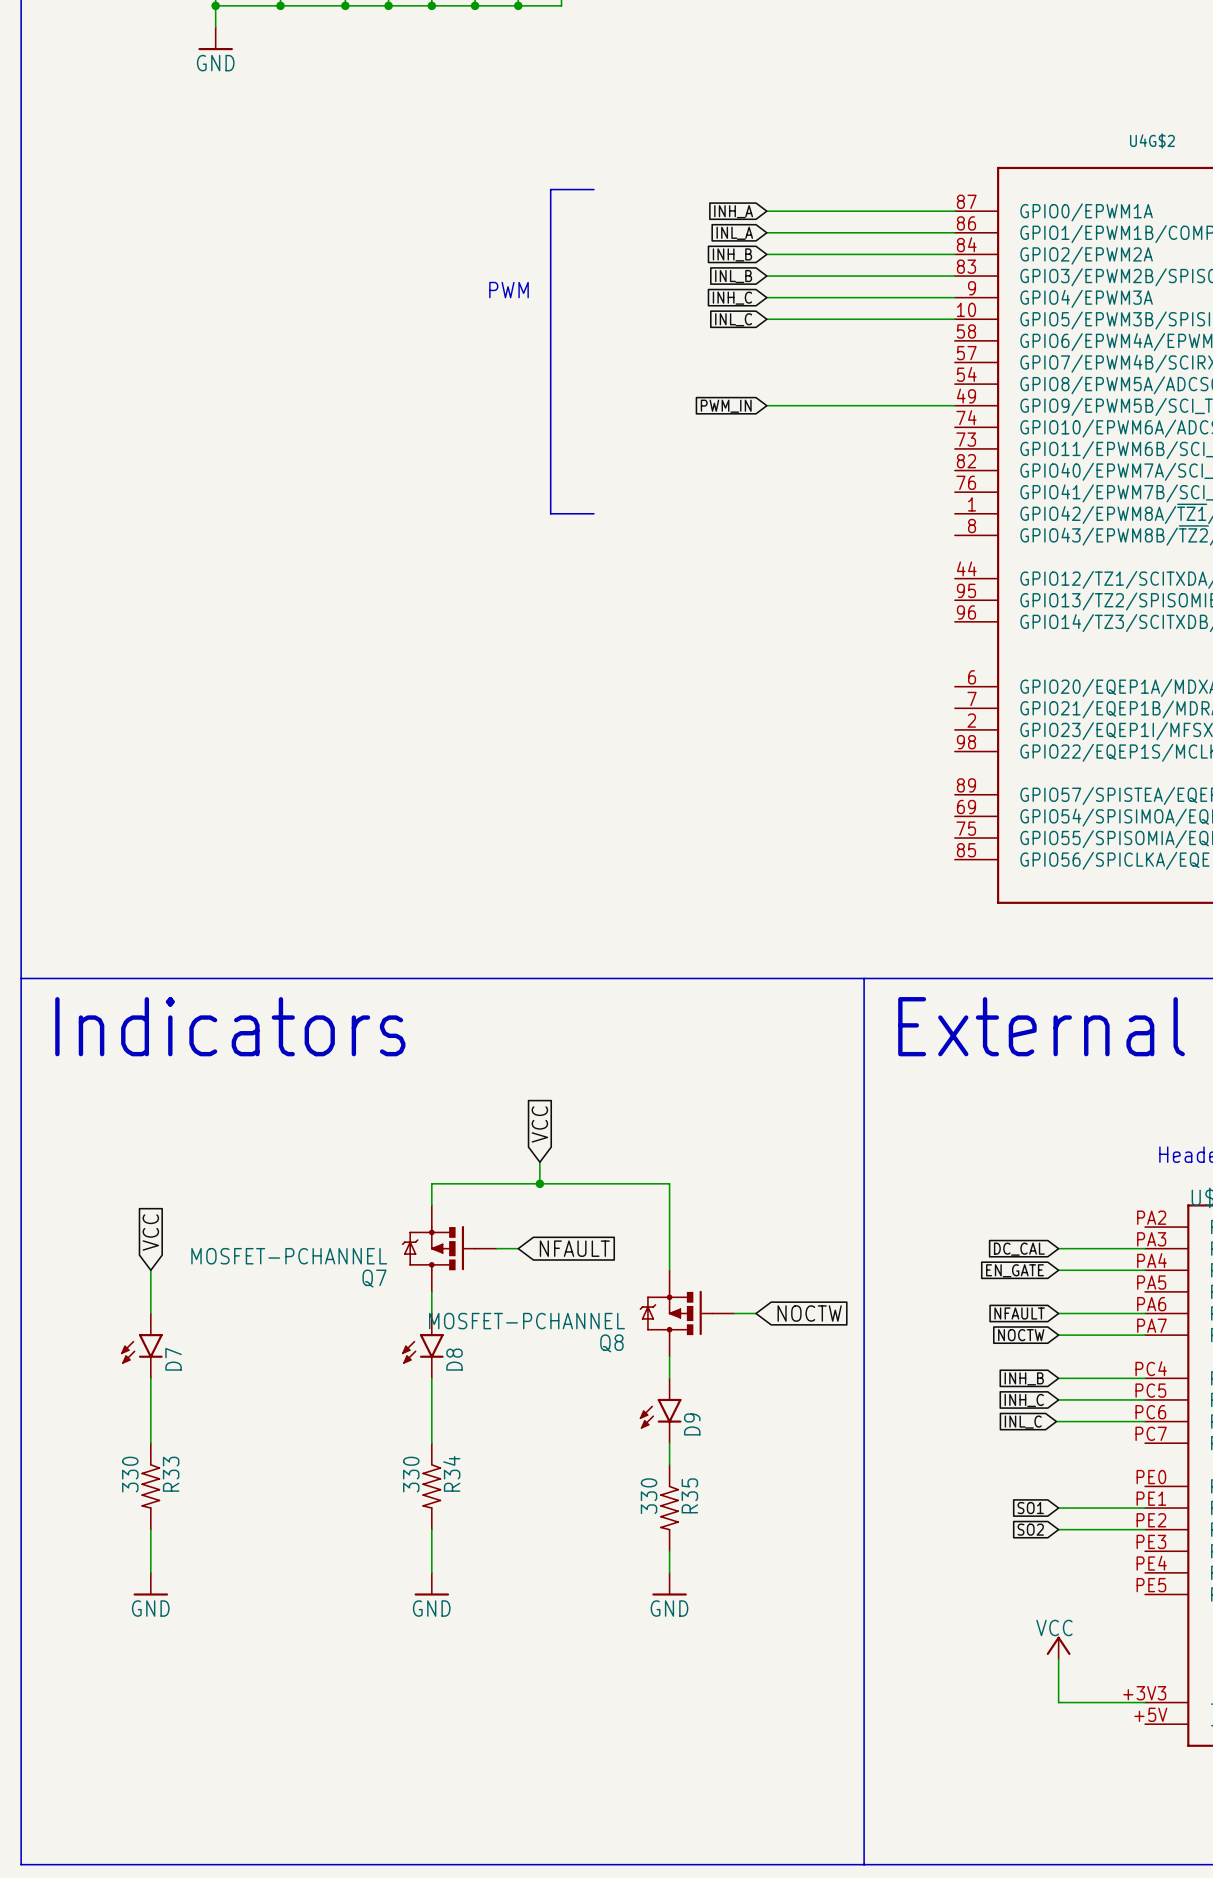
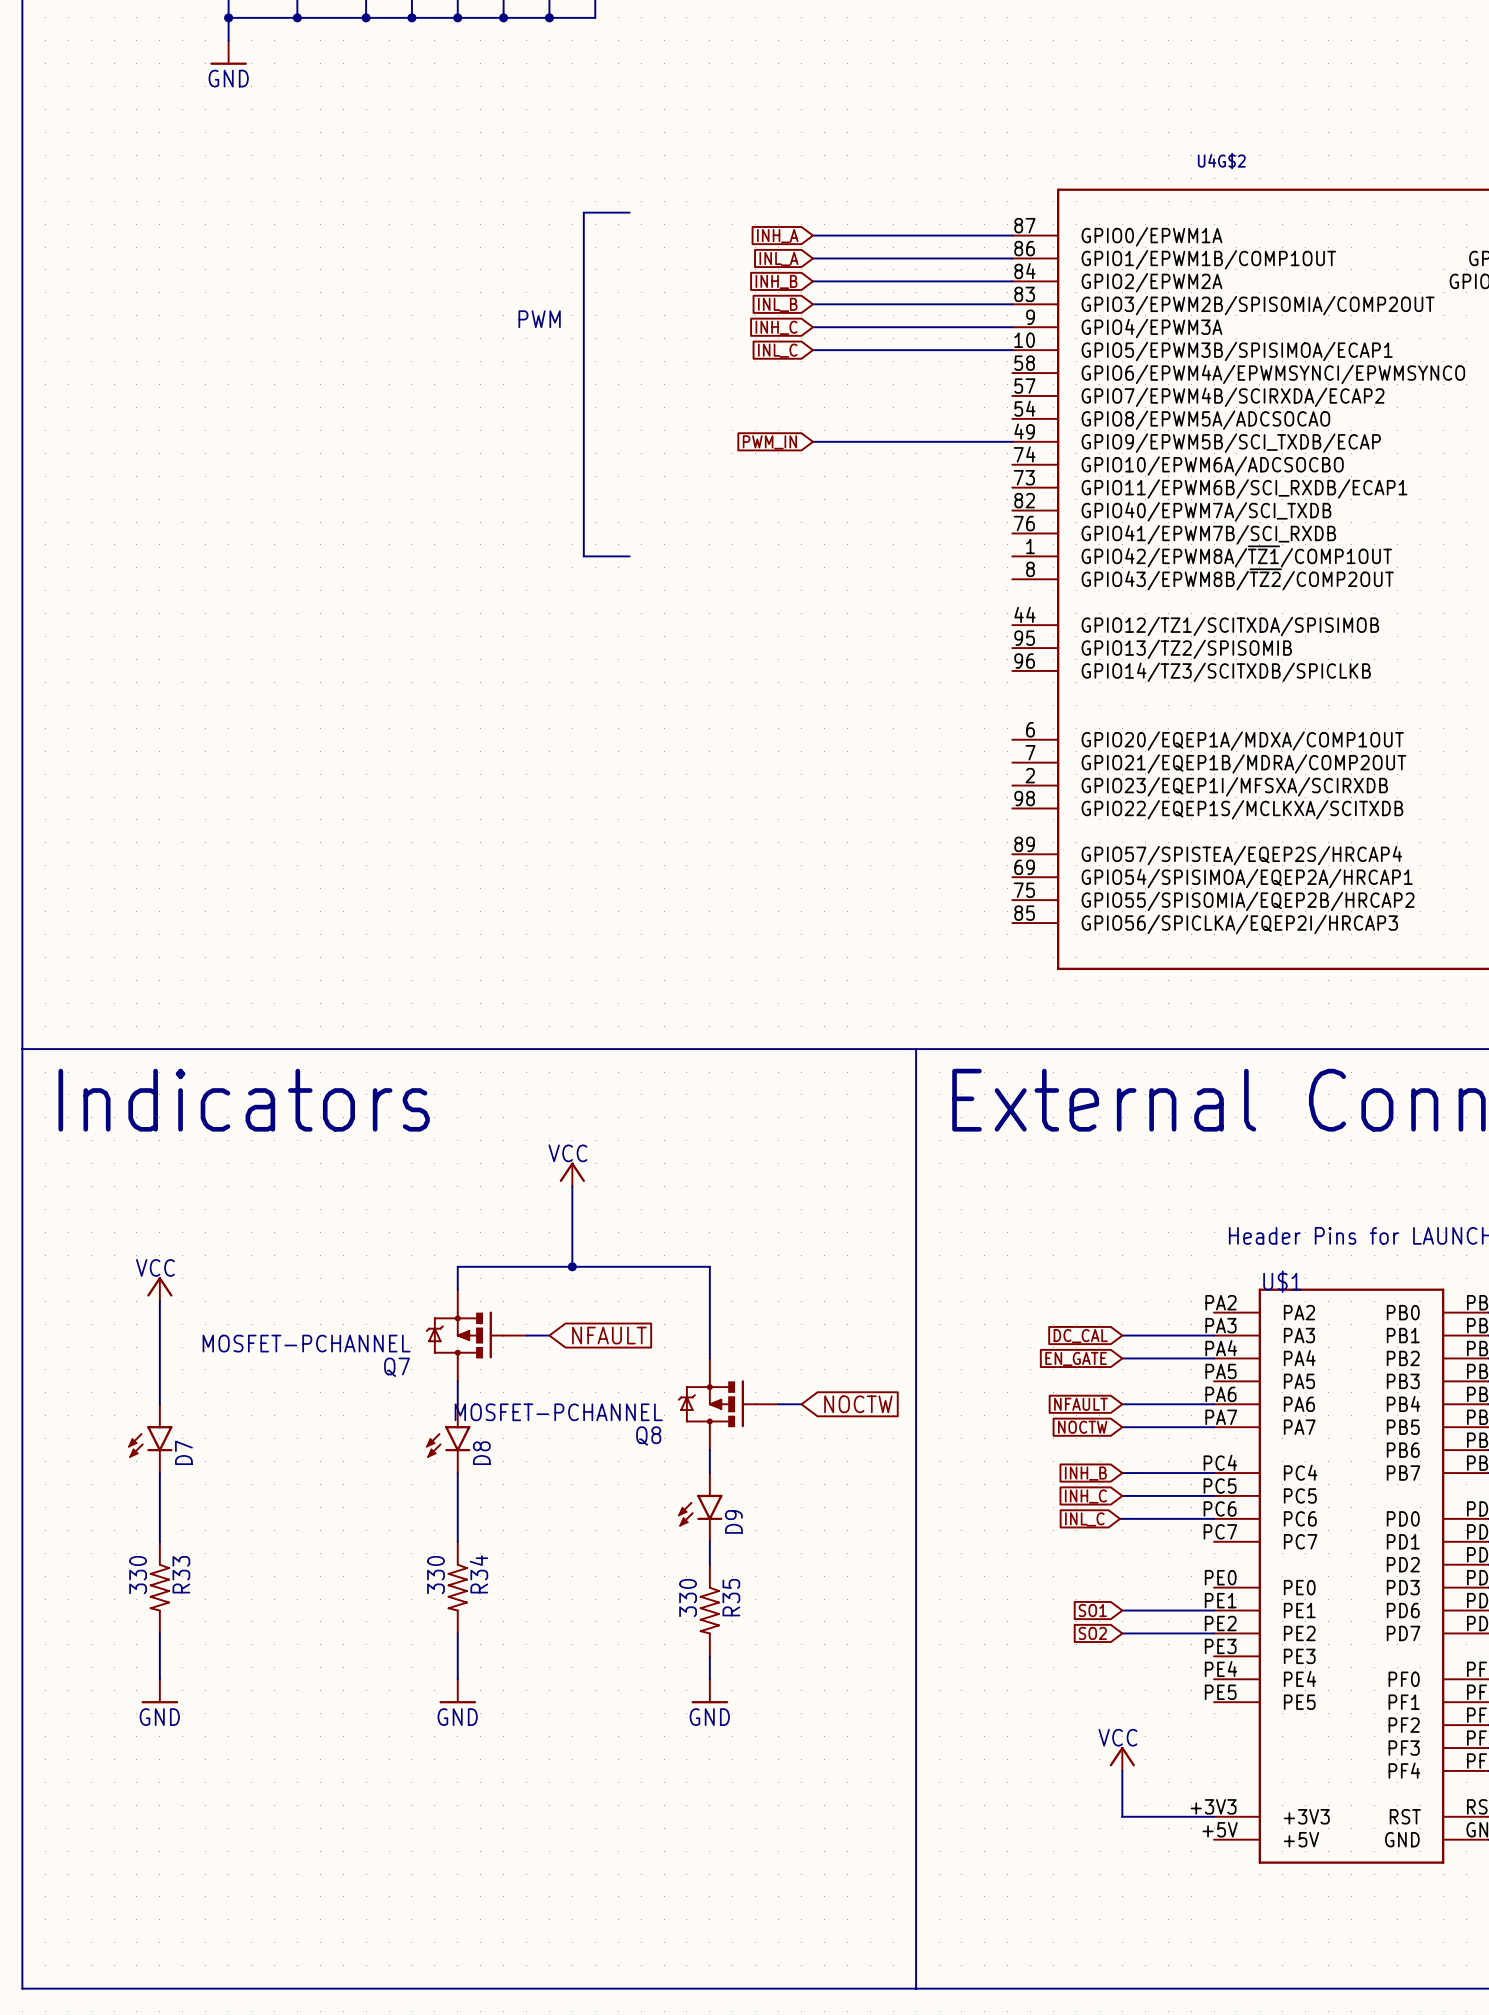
power symbol: none -> VCC (572, 1174)
wire: none -> (572, 1186) (572, 1243)
global label: VCC (539, 1124) -> none
power symbol: none -> VCC (159, 1289)
wire: none -> (159, 1301) (159, 1358)
global label: VCC (150, 1232) -> none

